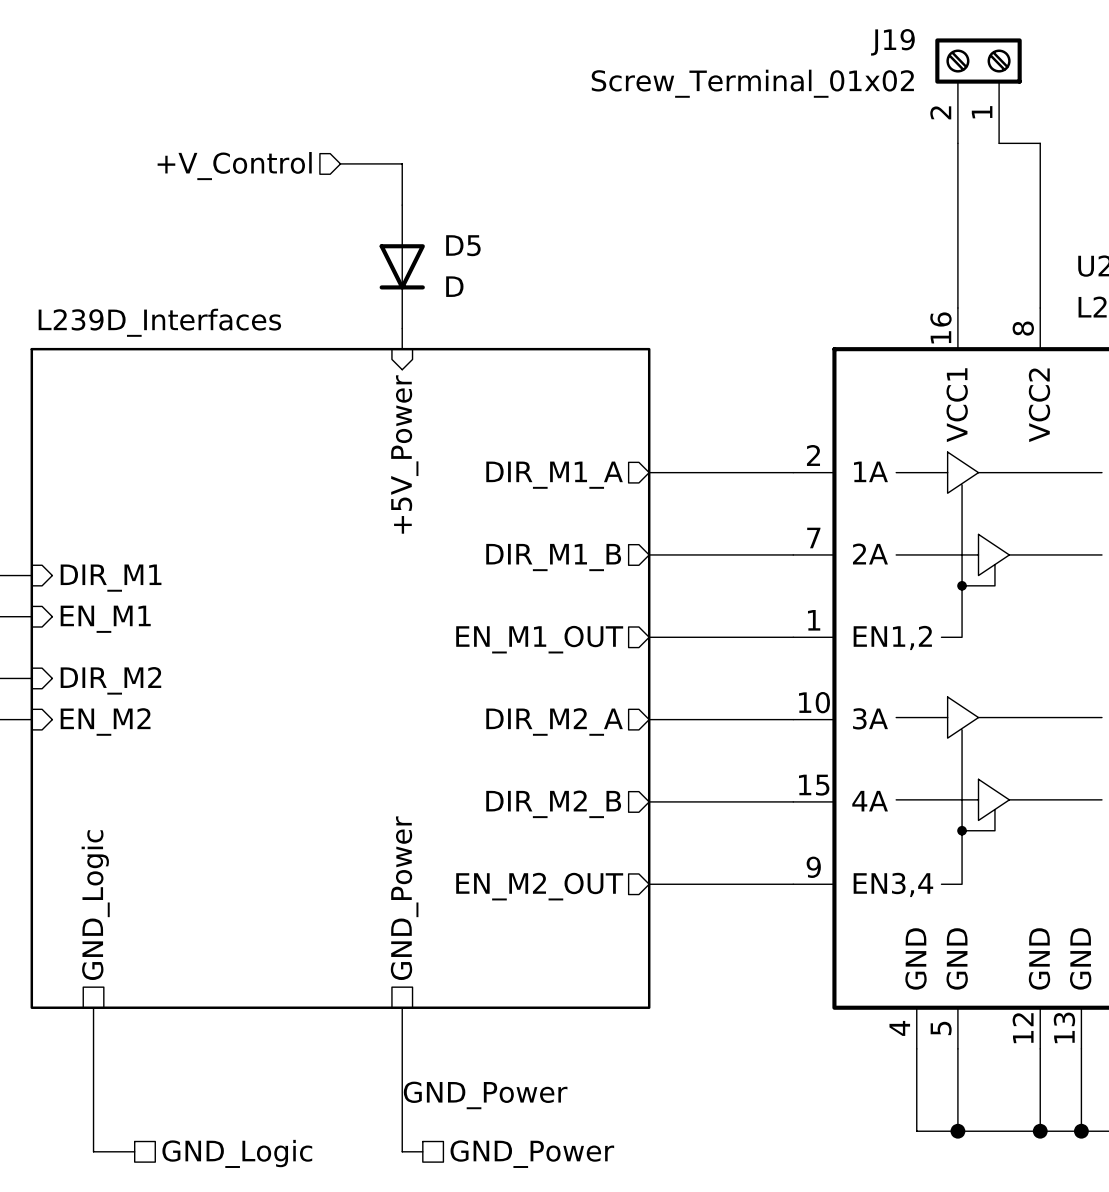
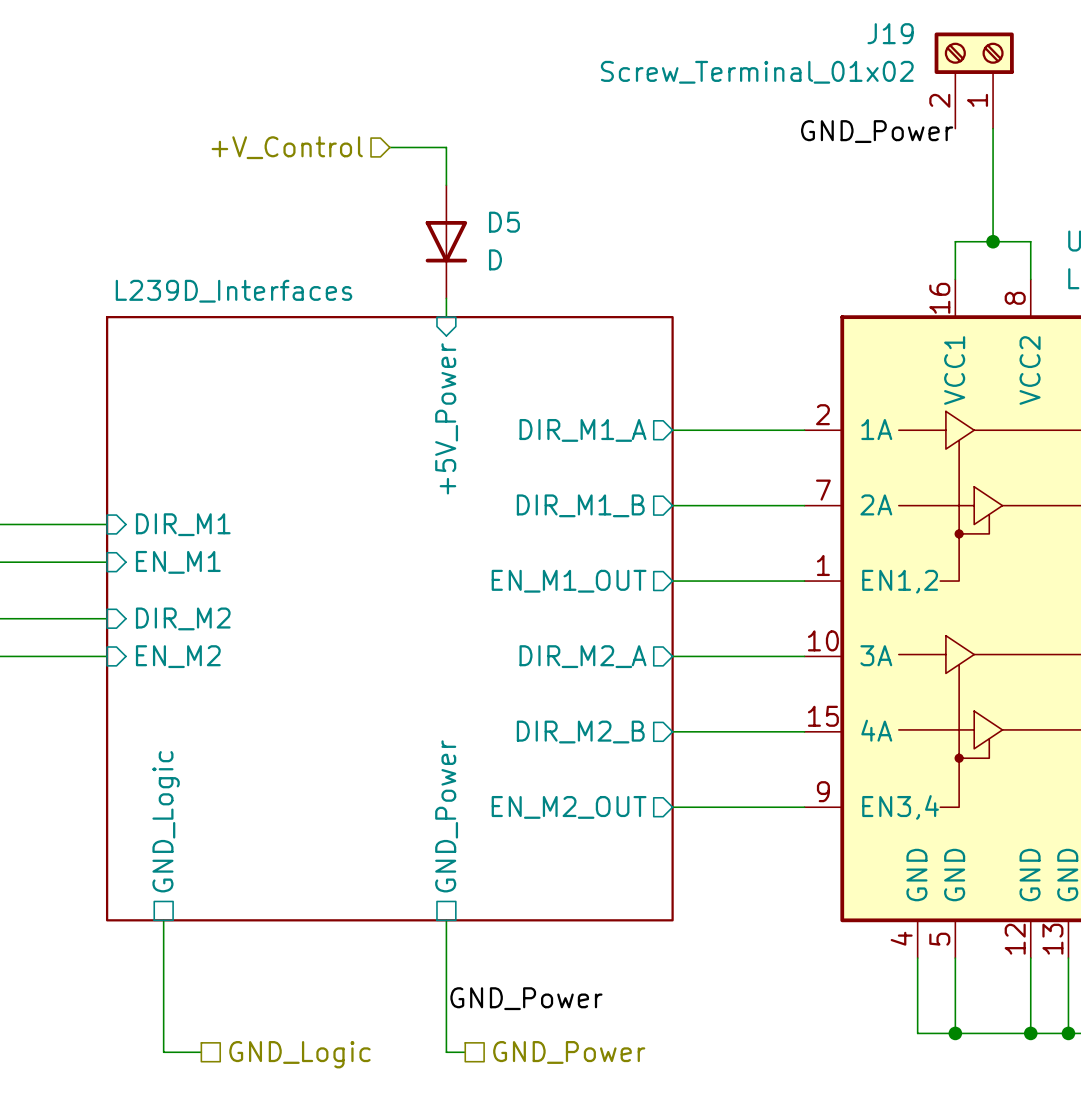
wire: (957, 143) (957, 266) -> (1030, 241) (955, 241)
wire: (999, 143) (1040, 143) (1040, 266) -> (993, 128) (993, 241)
label: none -> GND_Power (877, 131)
junction: none -> (993, 241)

